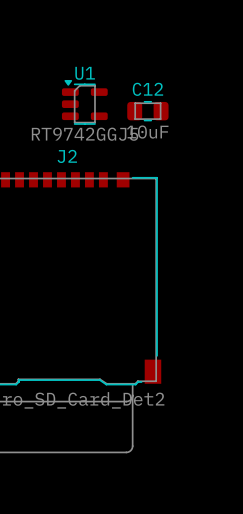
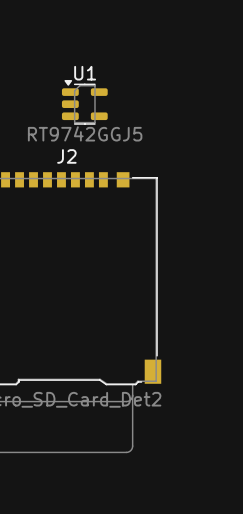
C12: 10uF (147, 111) -> none

